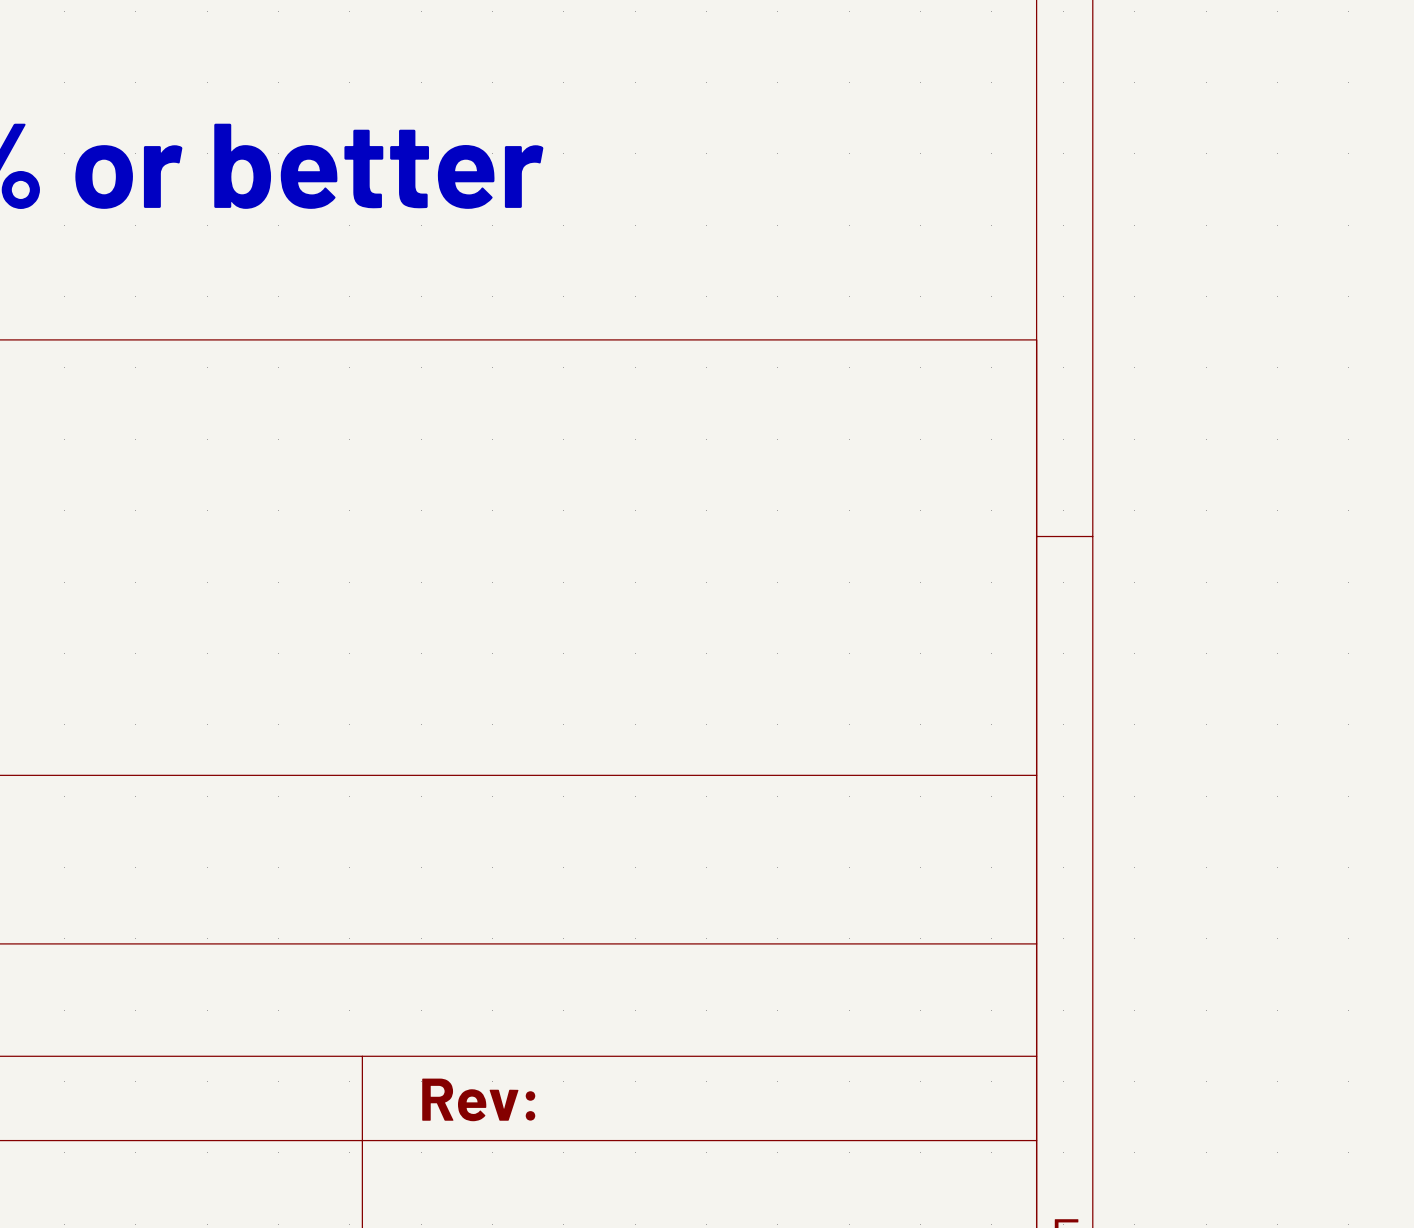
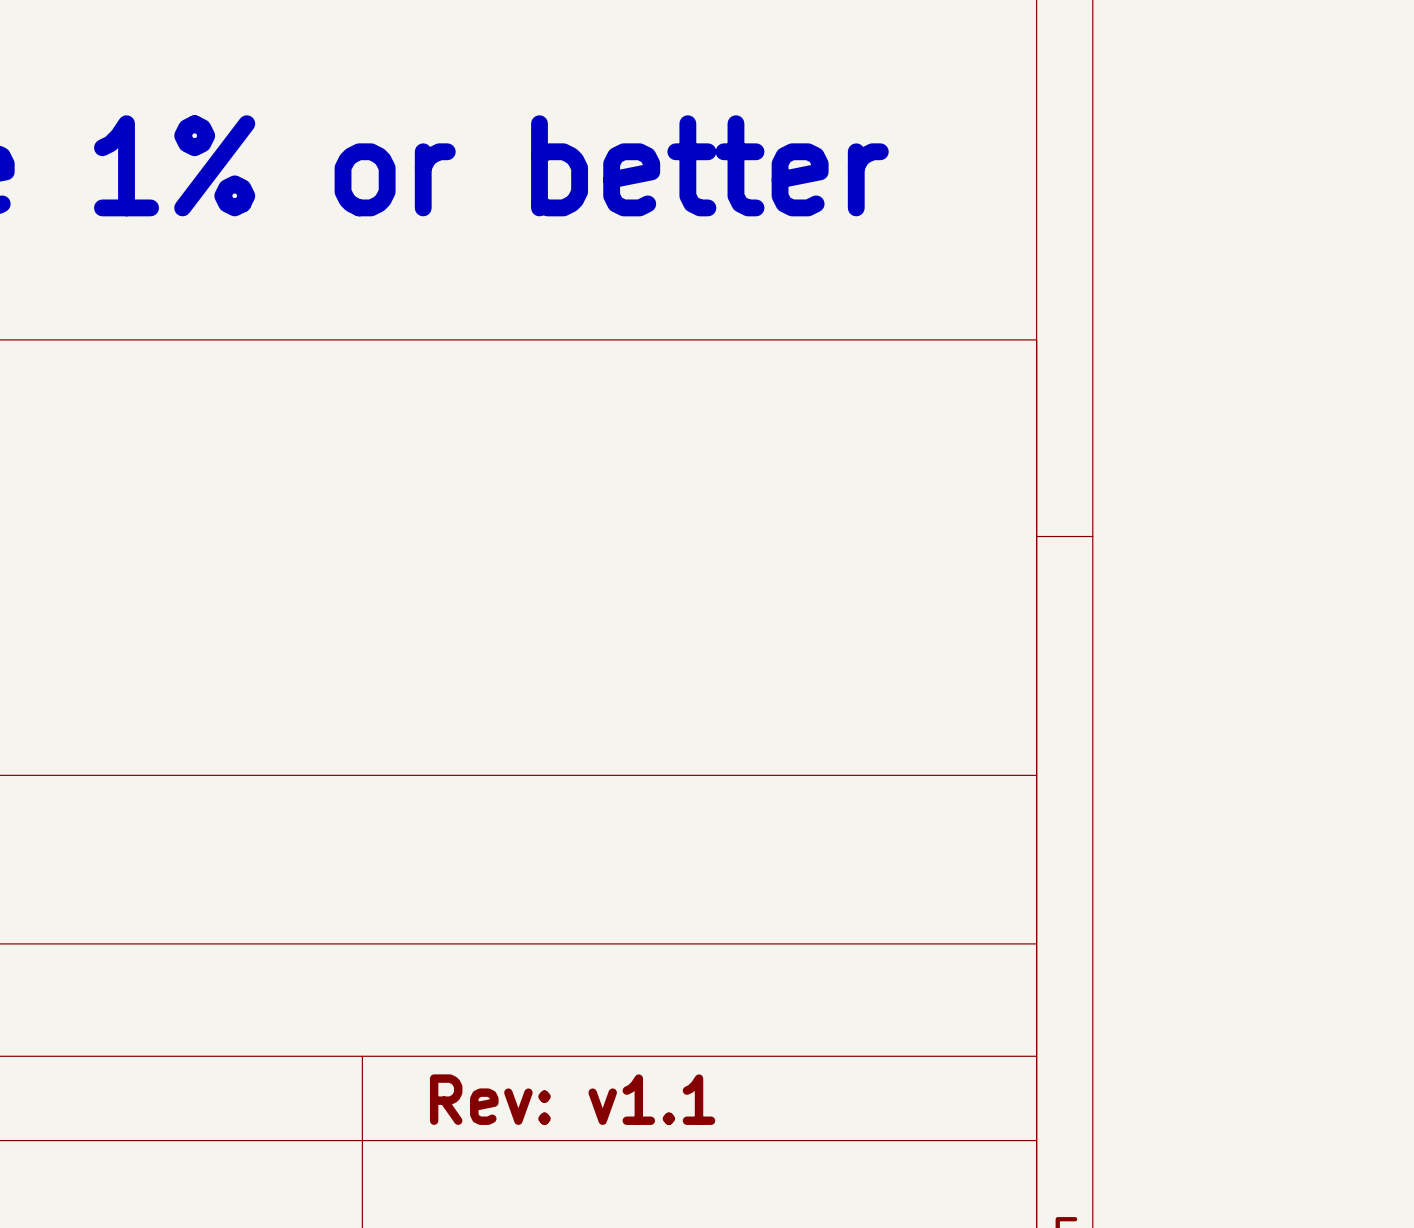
title block: Rev: (478, 1099) -> Rev: v1.1 (572, 1099)

